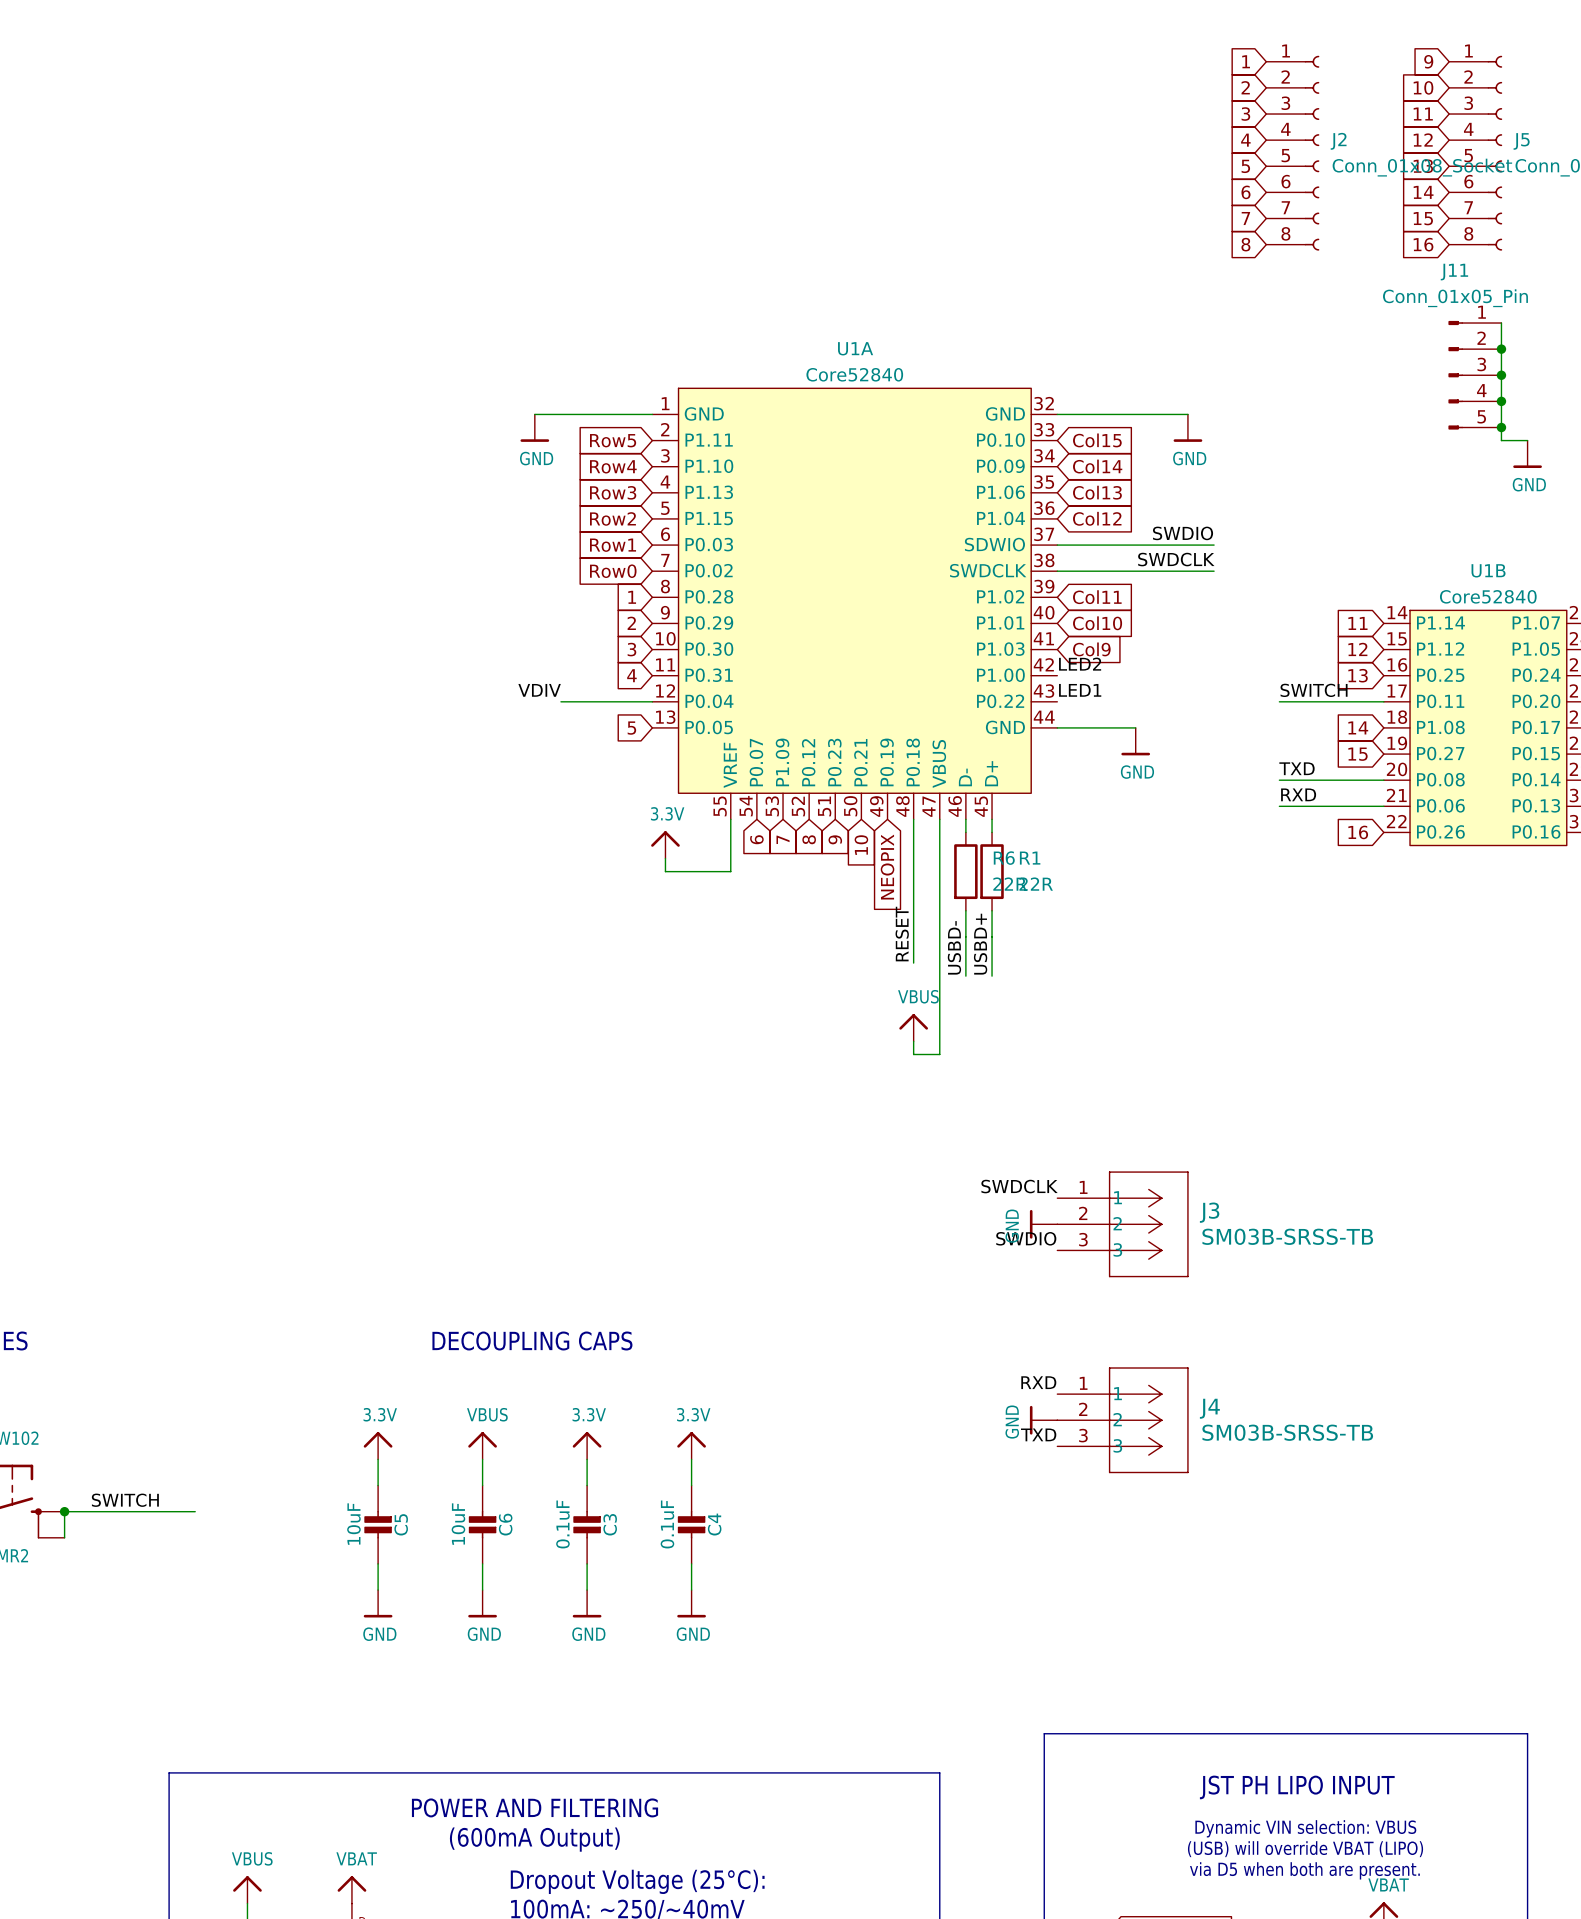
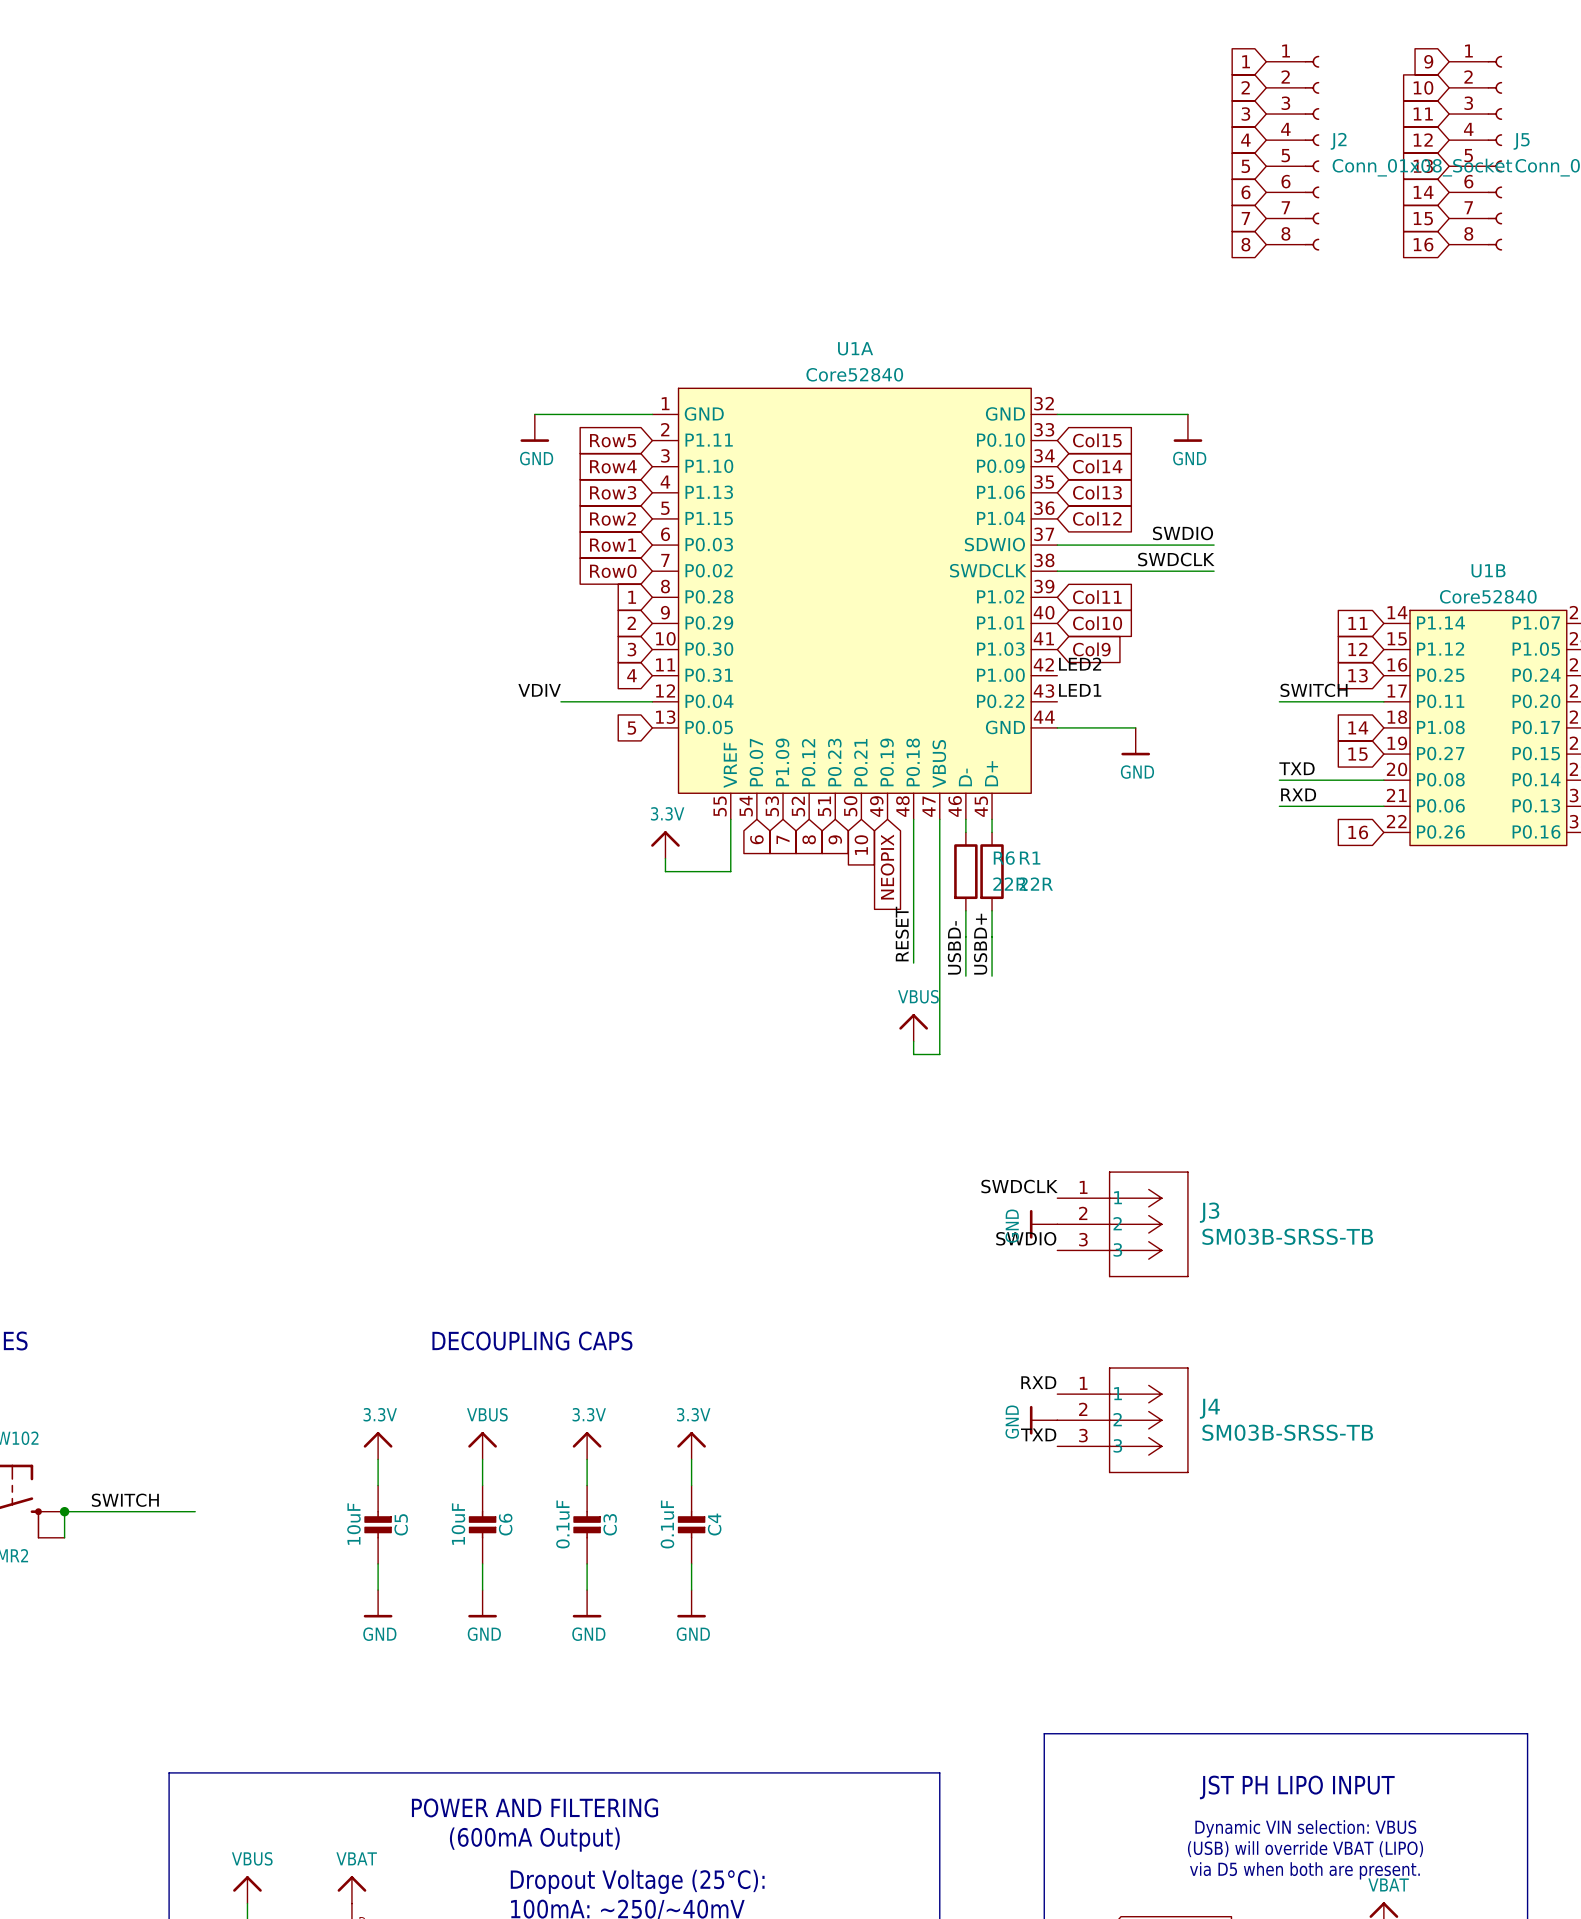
wire: (1501, 323) (1501, 440) (1527, 440) -> none
junction: (1501, 349) -> none
J11: Conn_01x05_Pin (1474, 375) -> none
junction: (1501, 375) -> none
junction: (1501, 401) -> none
junction: (1501, 427) -> none
power symbol: GND (1527, 454) -> none

